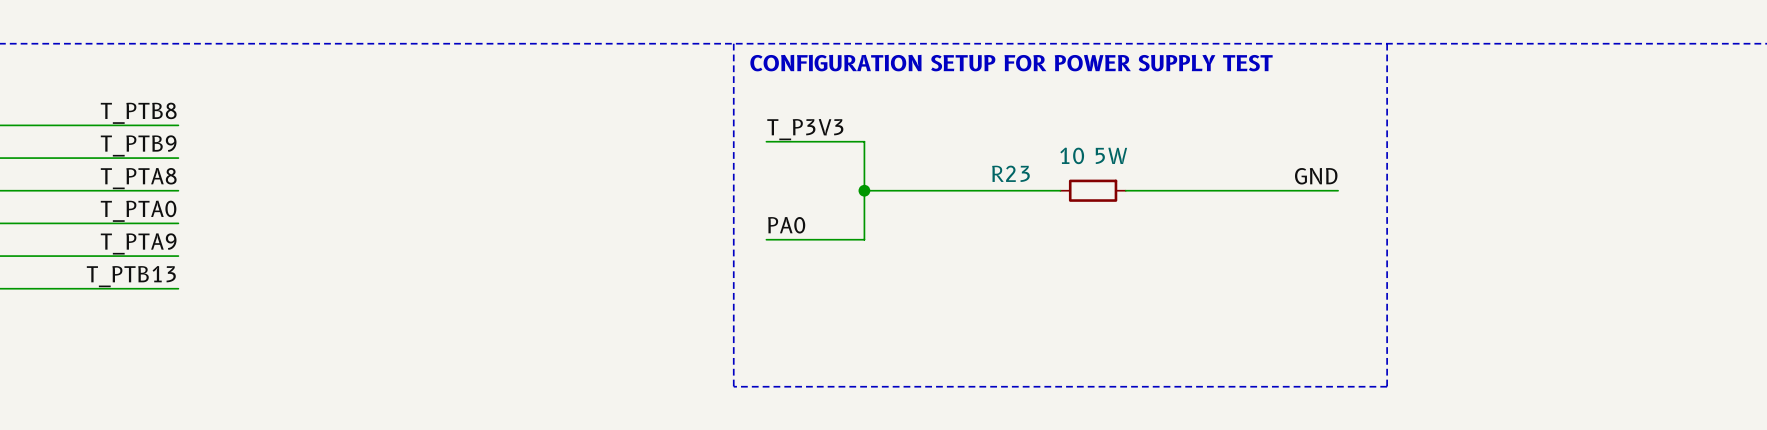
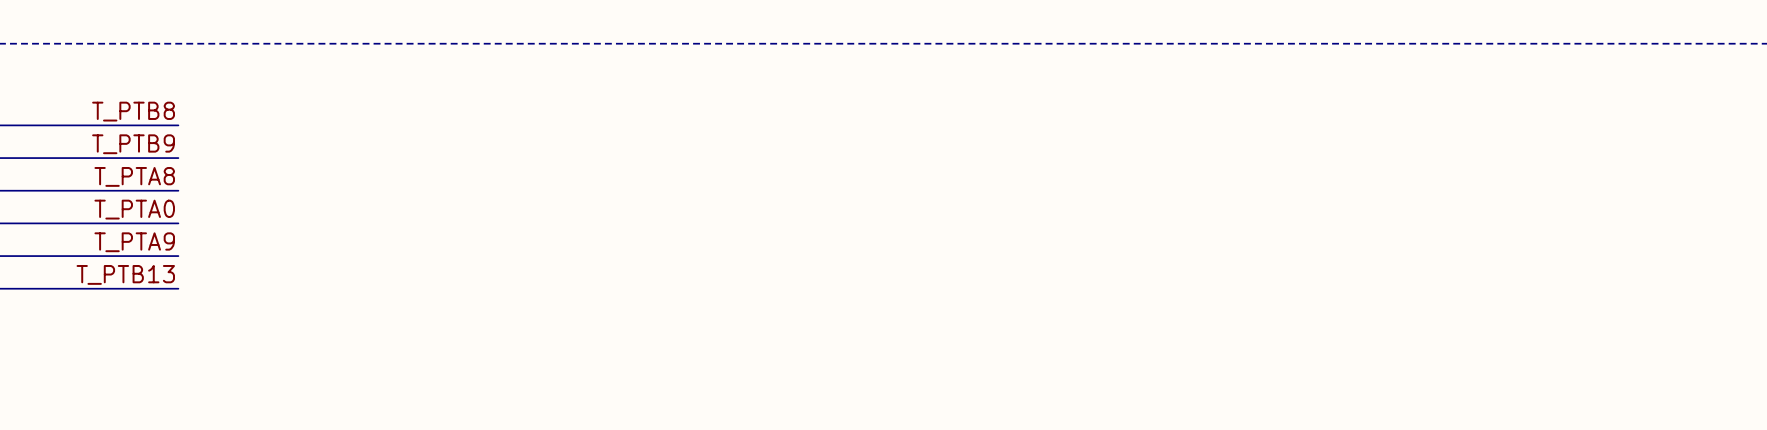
line: (733, 43) (733, 386) (1387, 386) (1387, 43) -> none
text: CONFIGURATION SETUP FOR POWER SUPPLY TEST (1011, 63) -> none
label: T_P3V3 (805, 129) -> none
wire: (766, 141) (864, 141) (864, 239) (766, 239) -> none
label: GND (1316, 176) -> none
wire: (864, 190) (1060, 190) -> none
junction: (864, 190) -> none
R23: 10 5W (1093, 190) -> none
wire: (1125, 190) (1338, 190) -> none
label: PA0 (786, 225) -> none

